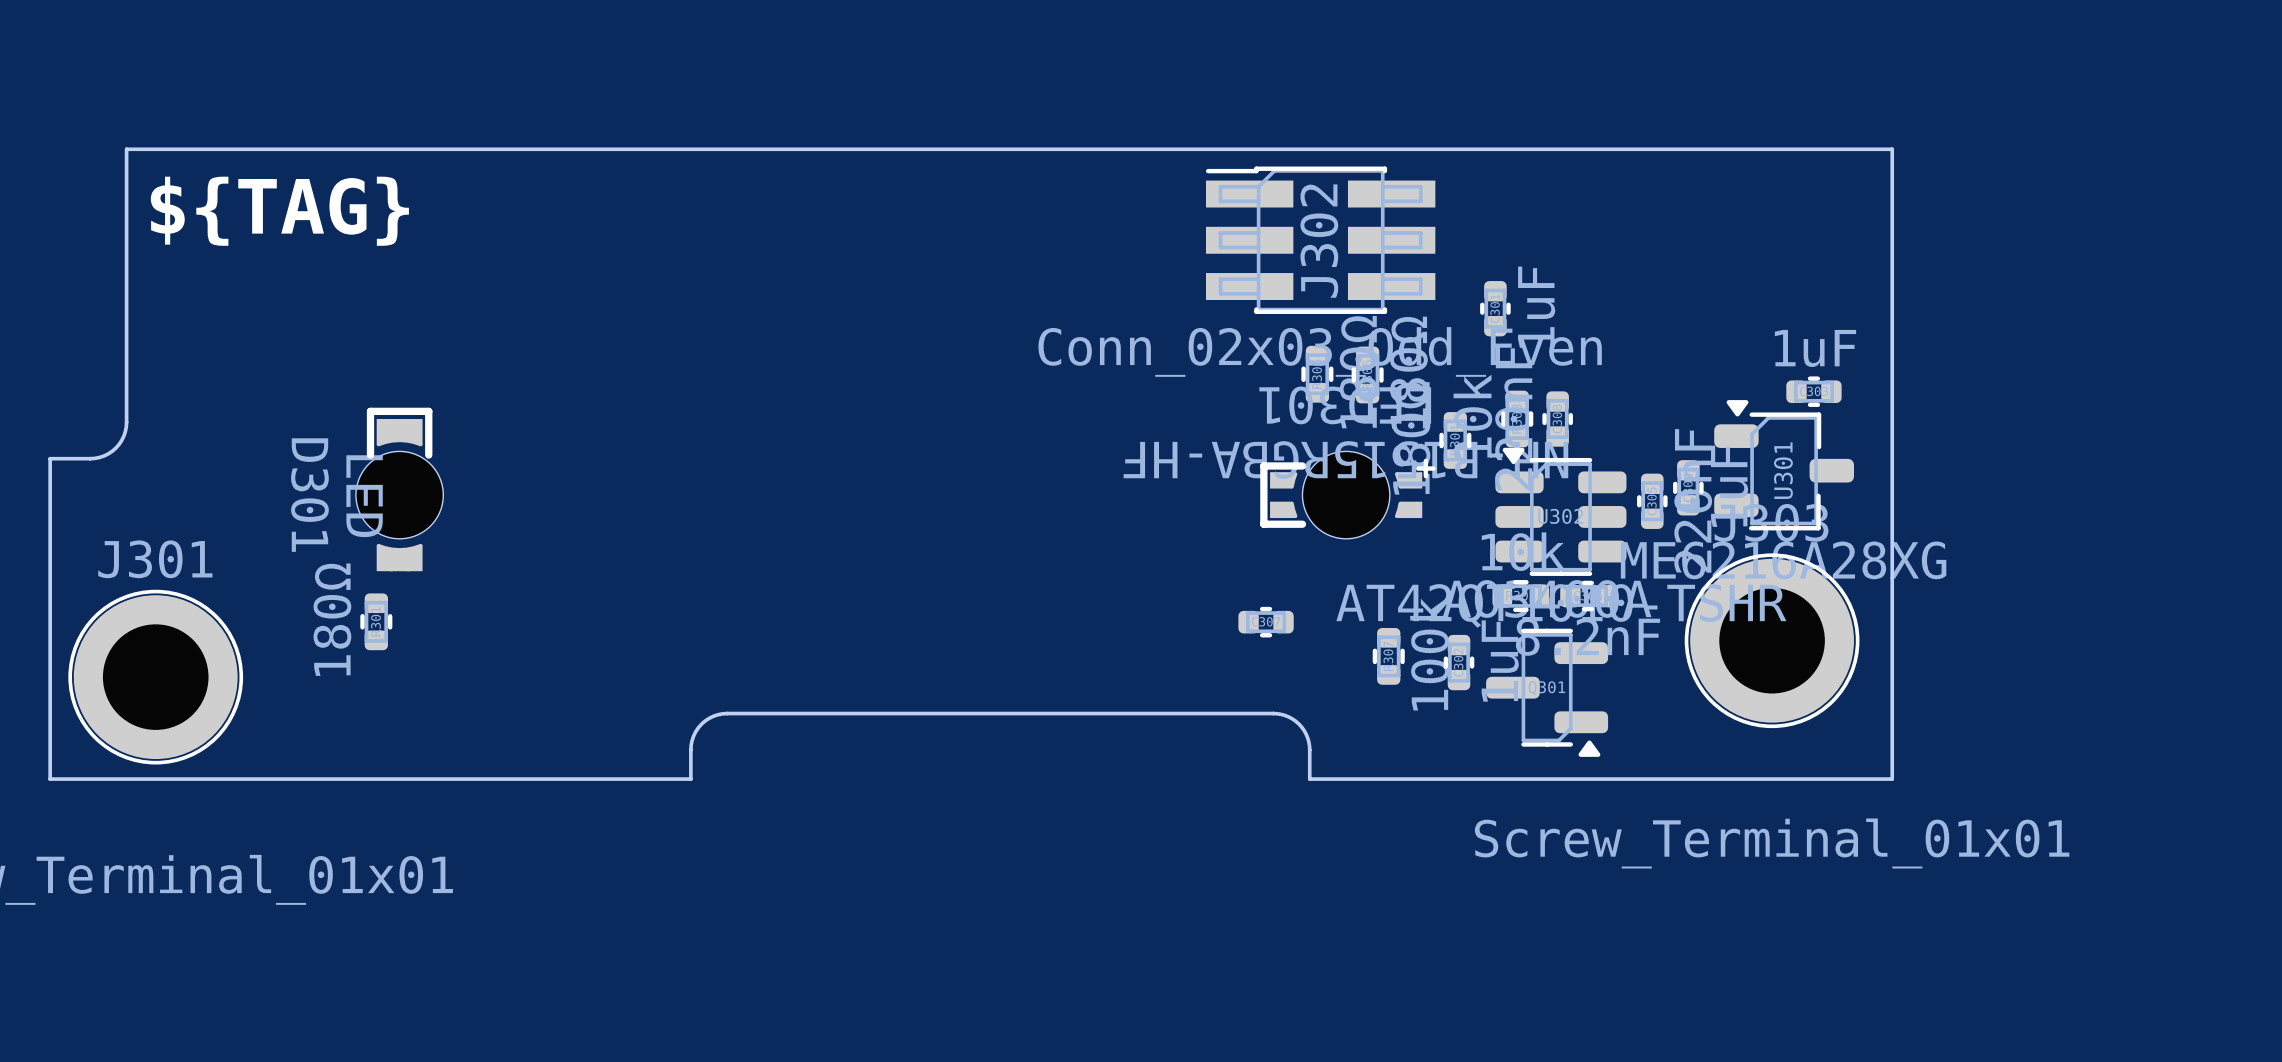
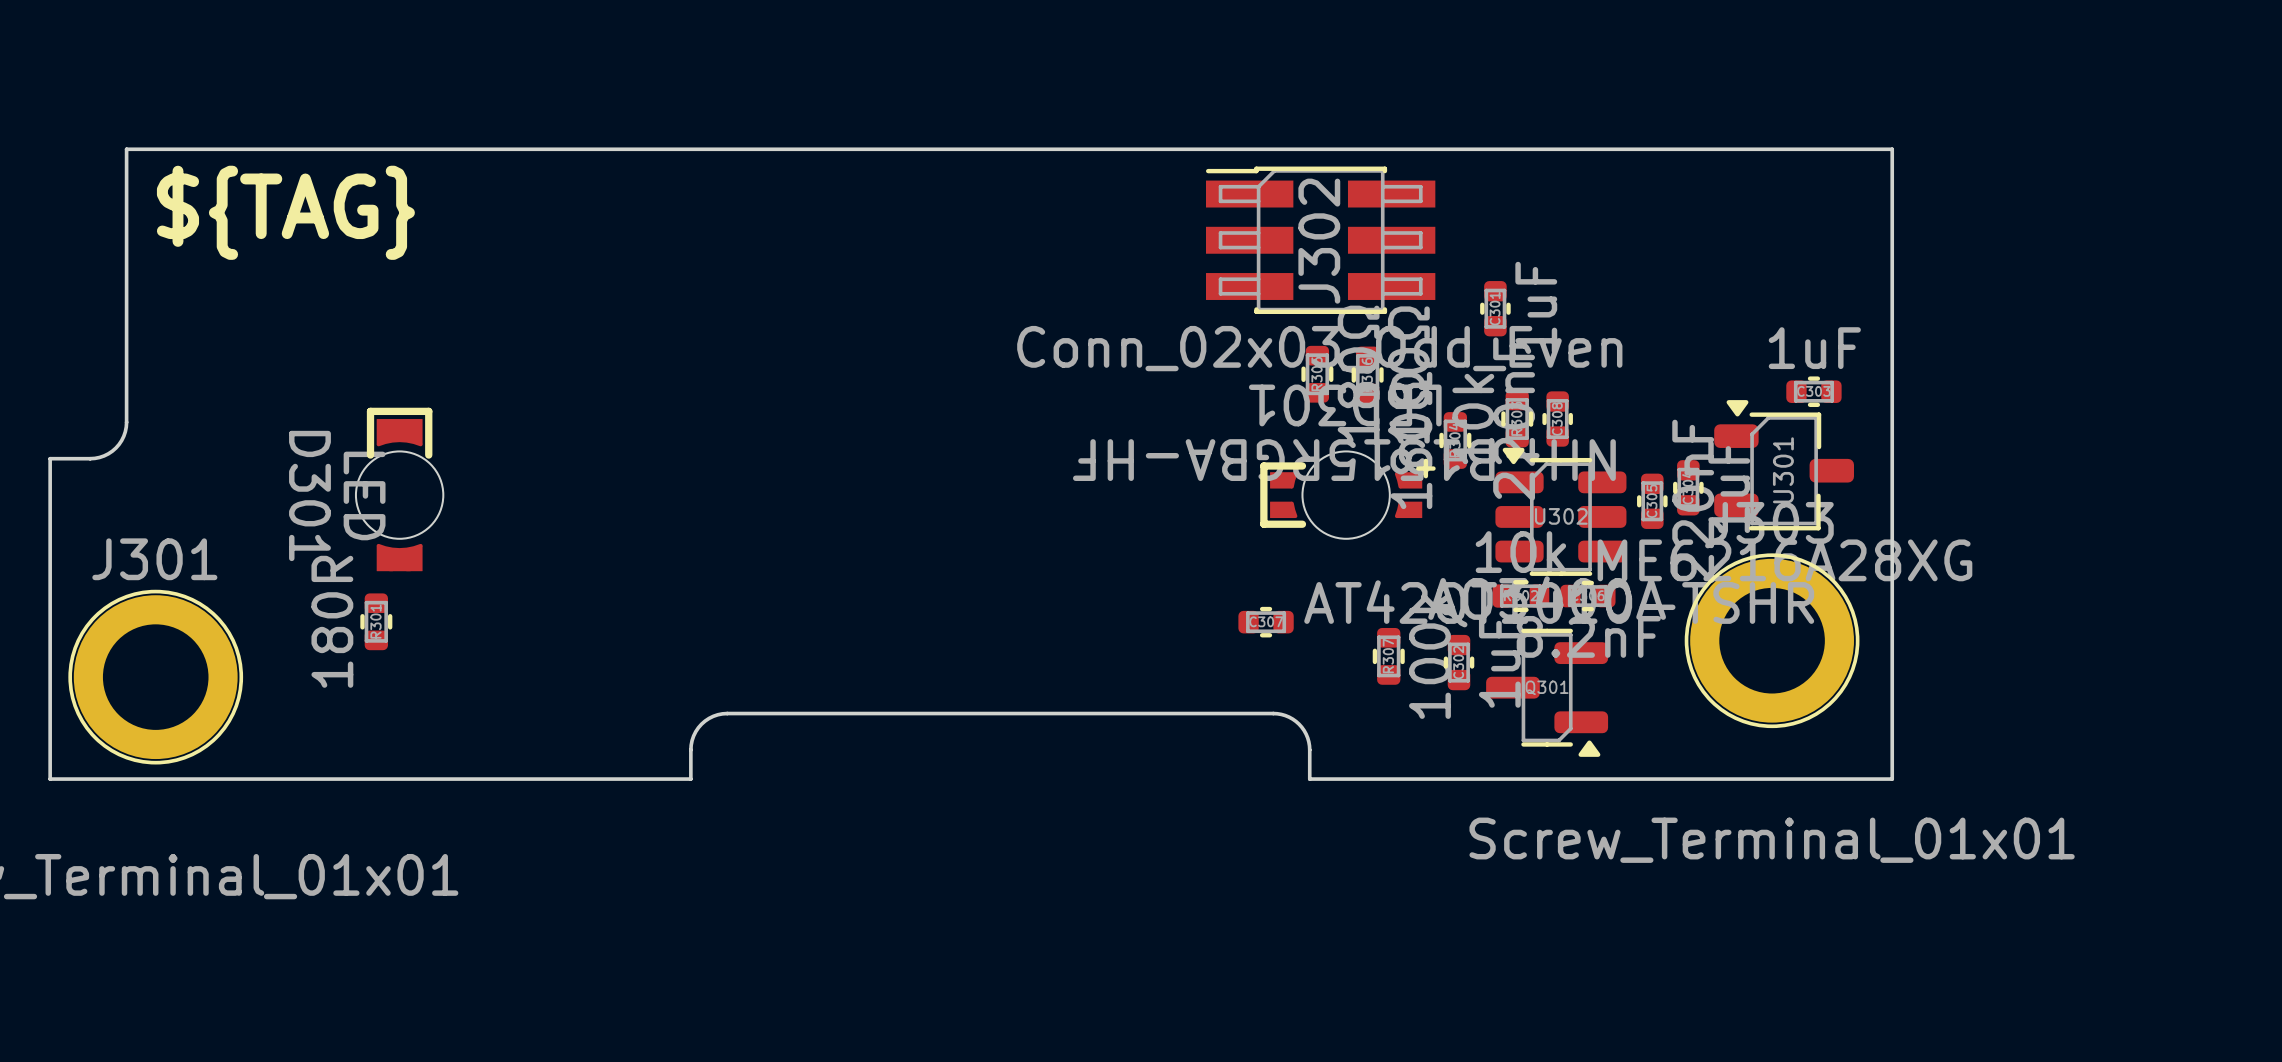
R301 value: 180Ω (332, 619) -> 180R (332, 621)

